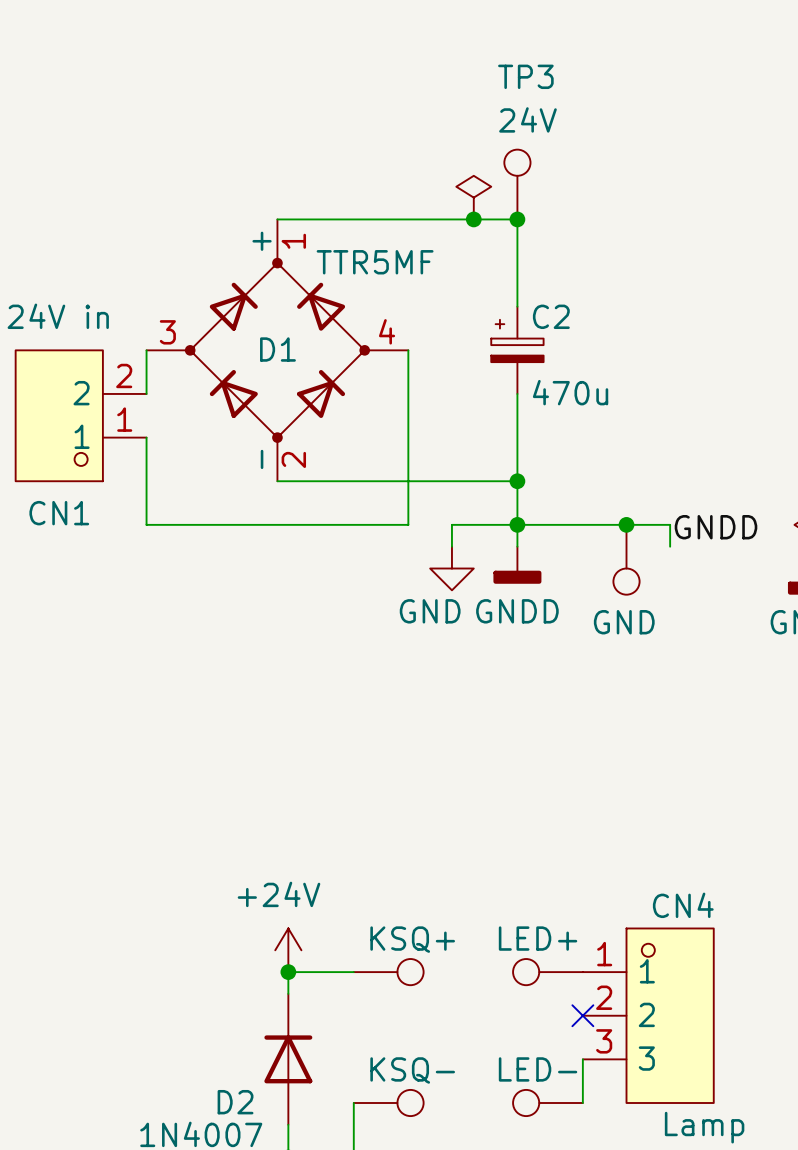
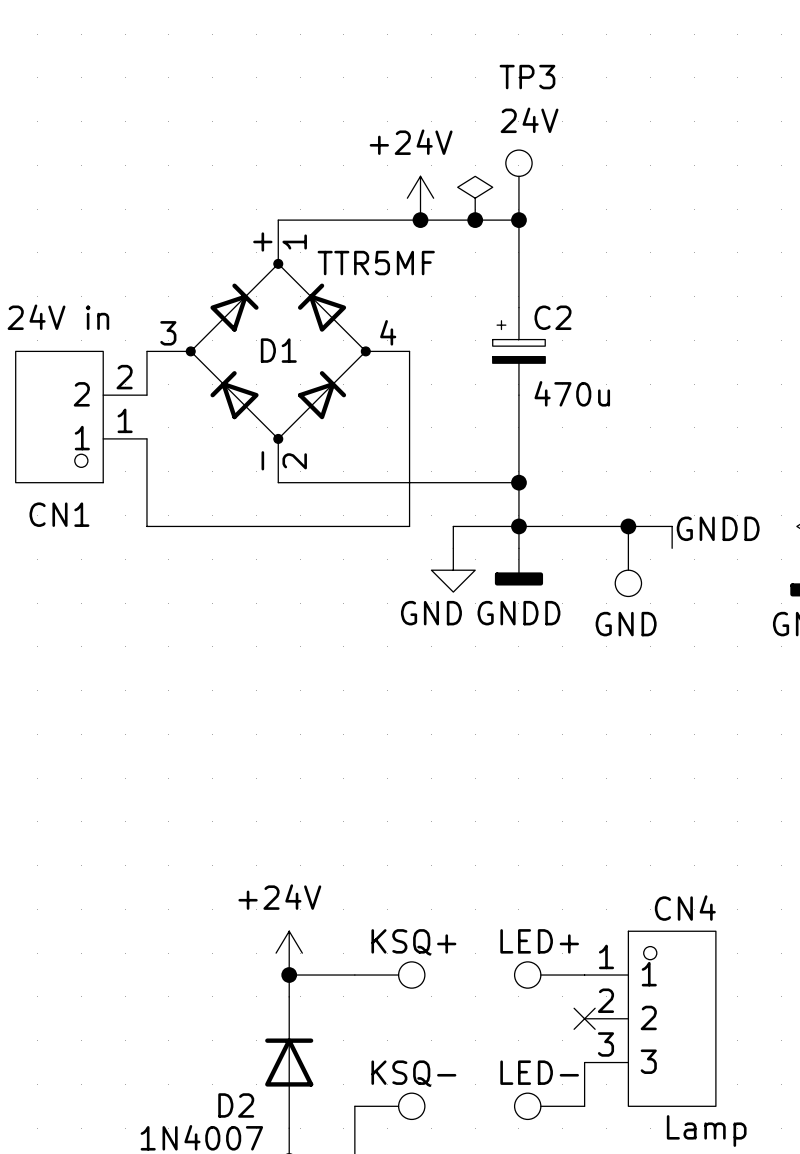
power symbol: none -> +24V (420, 198)
junction: none -> (420, 220)

